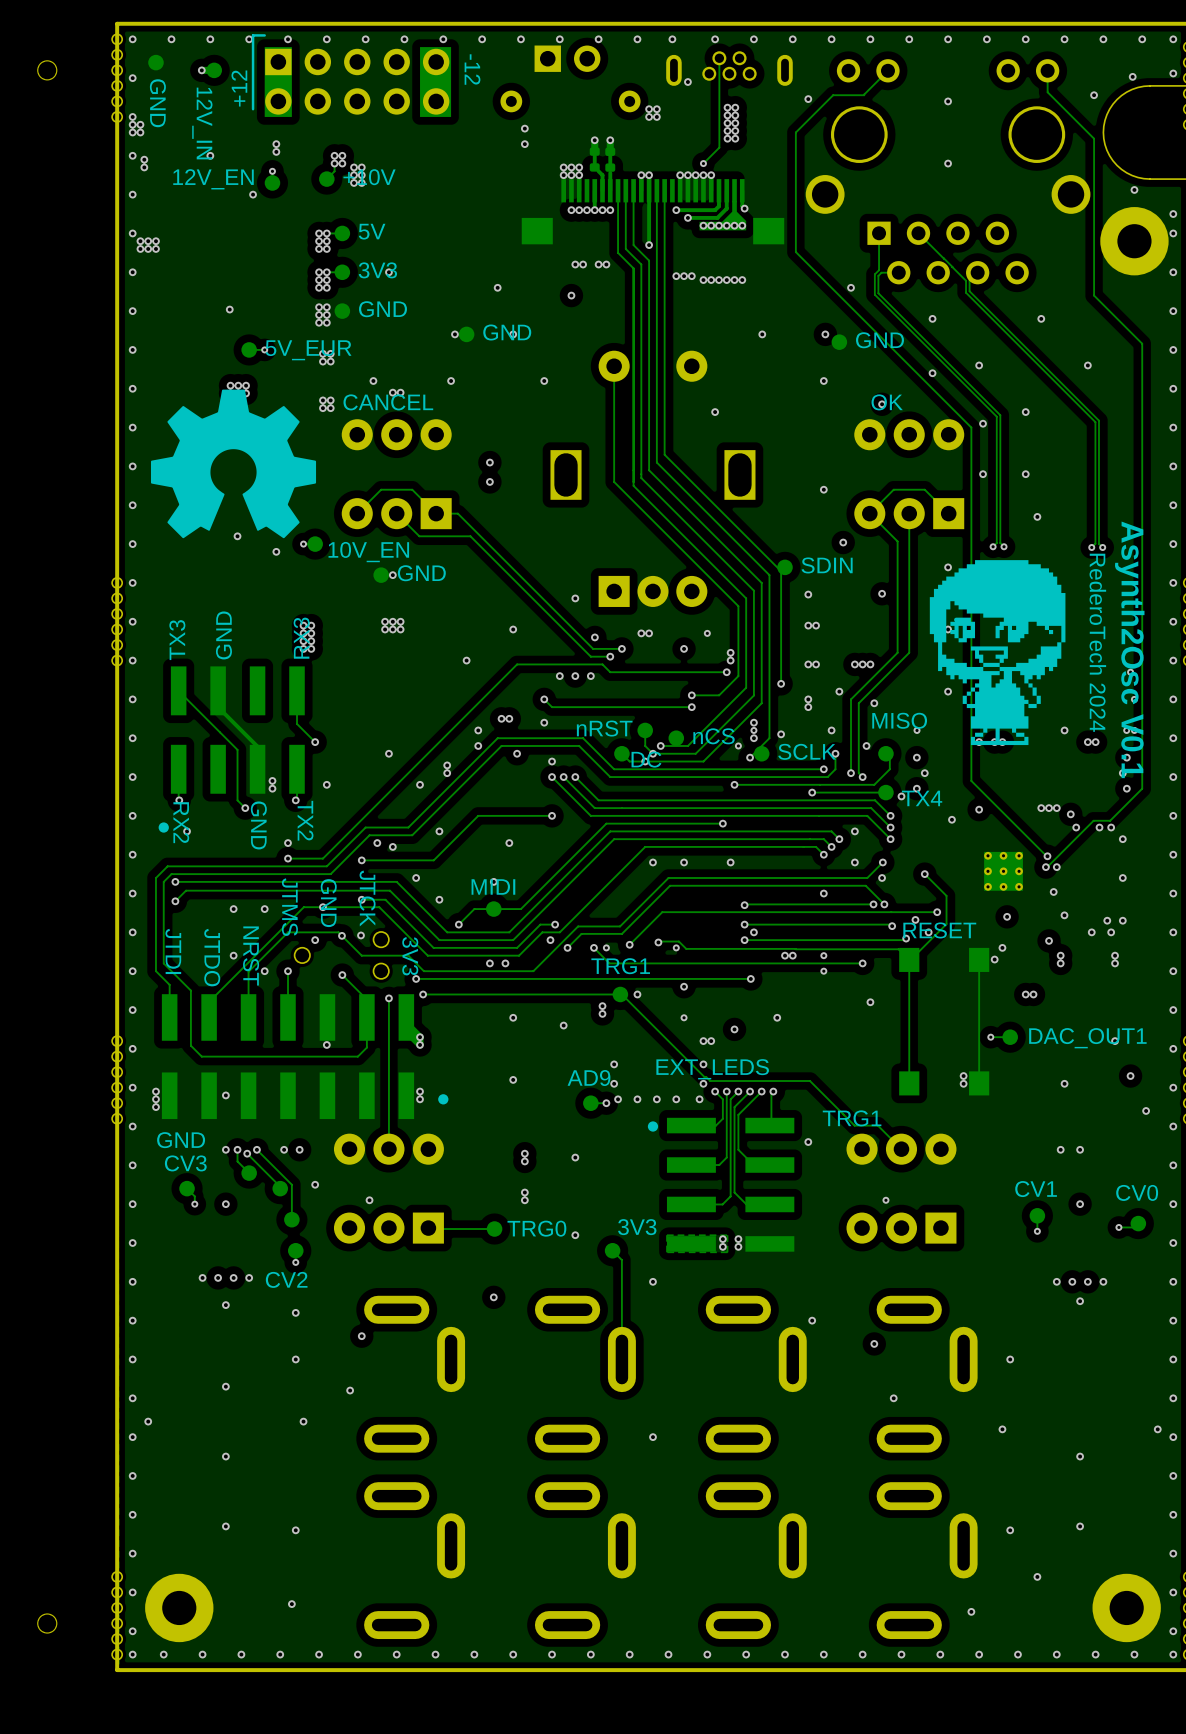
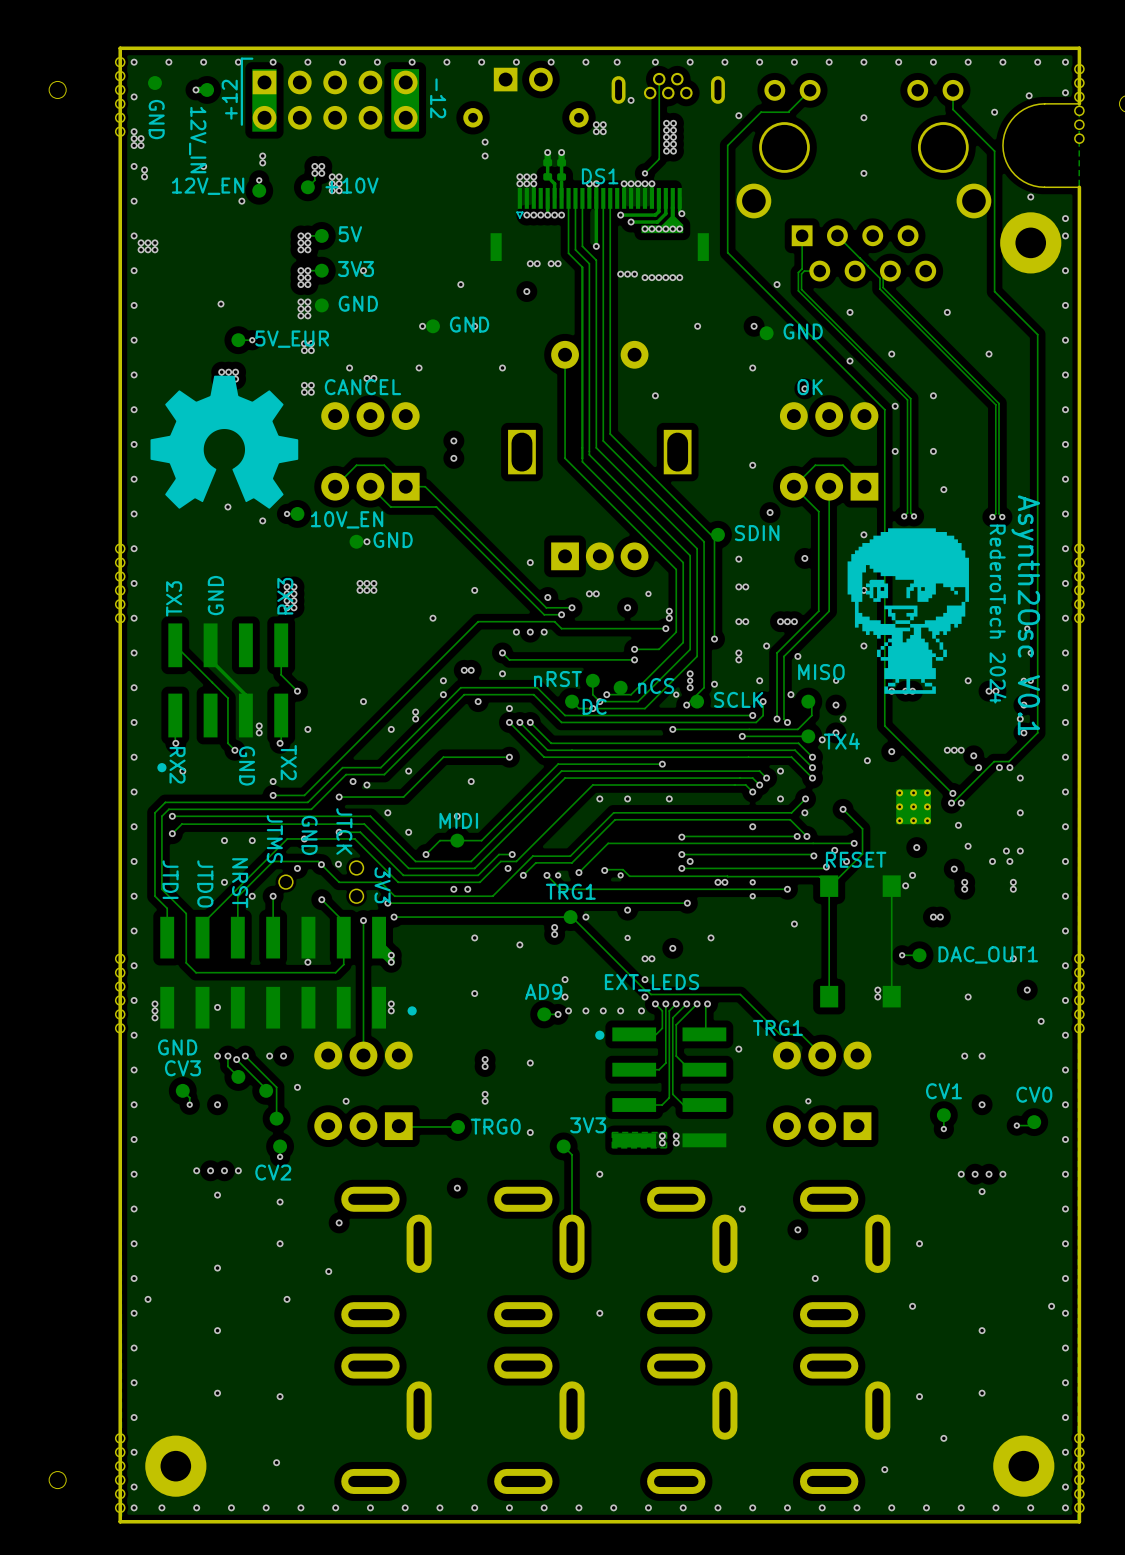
part: (652, 211) -> none
DS1: none -> (599, 224)

